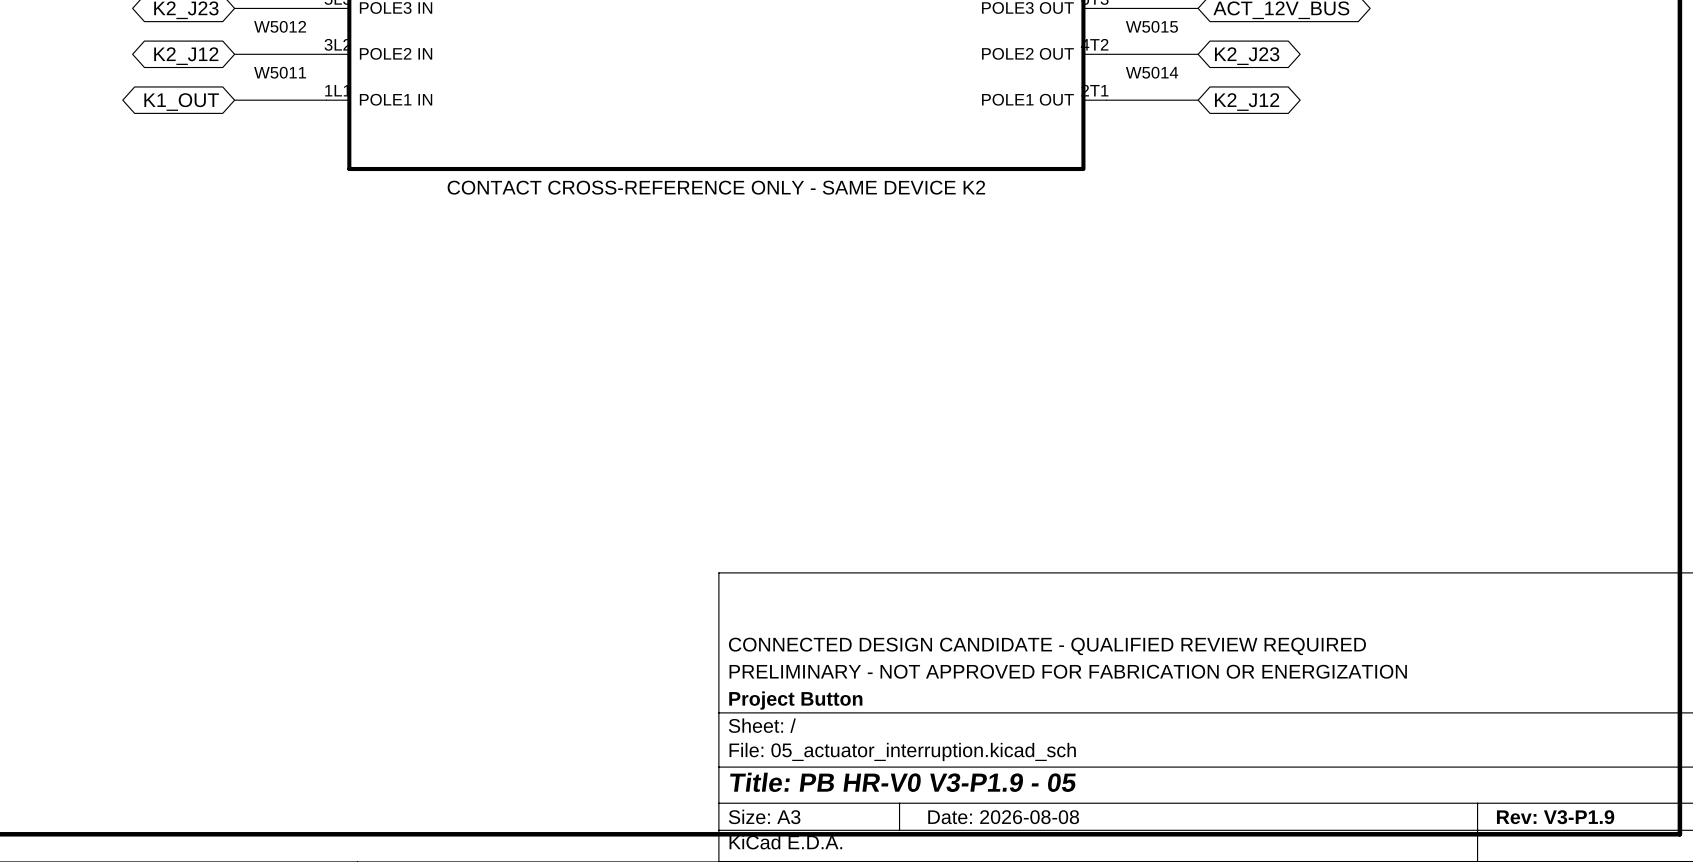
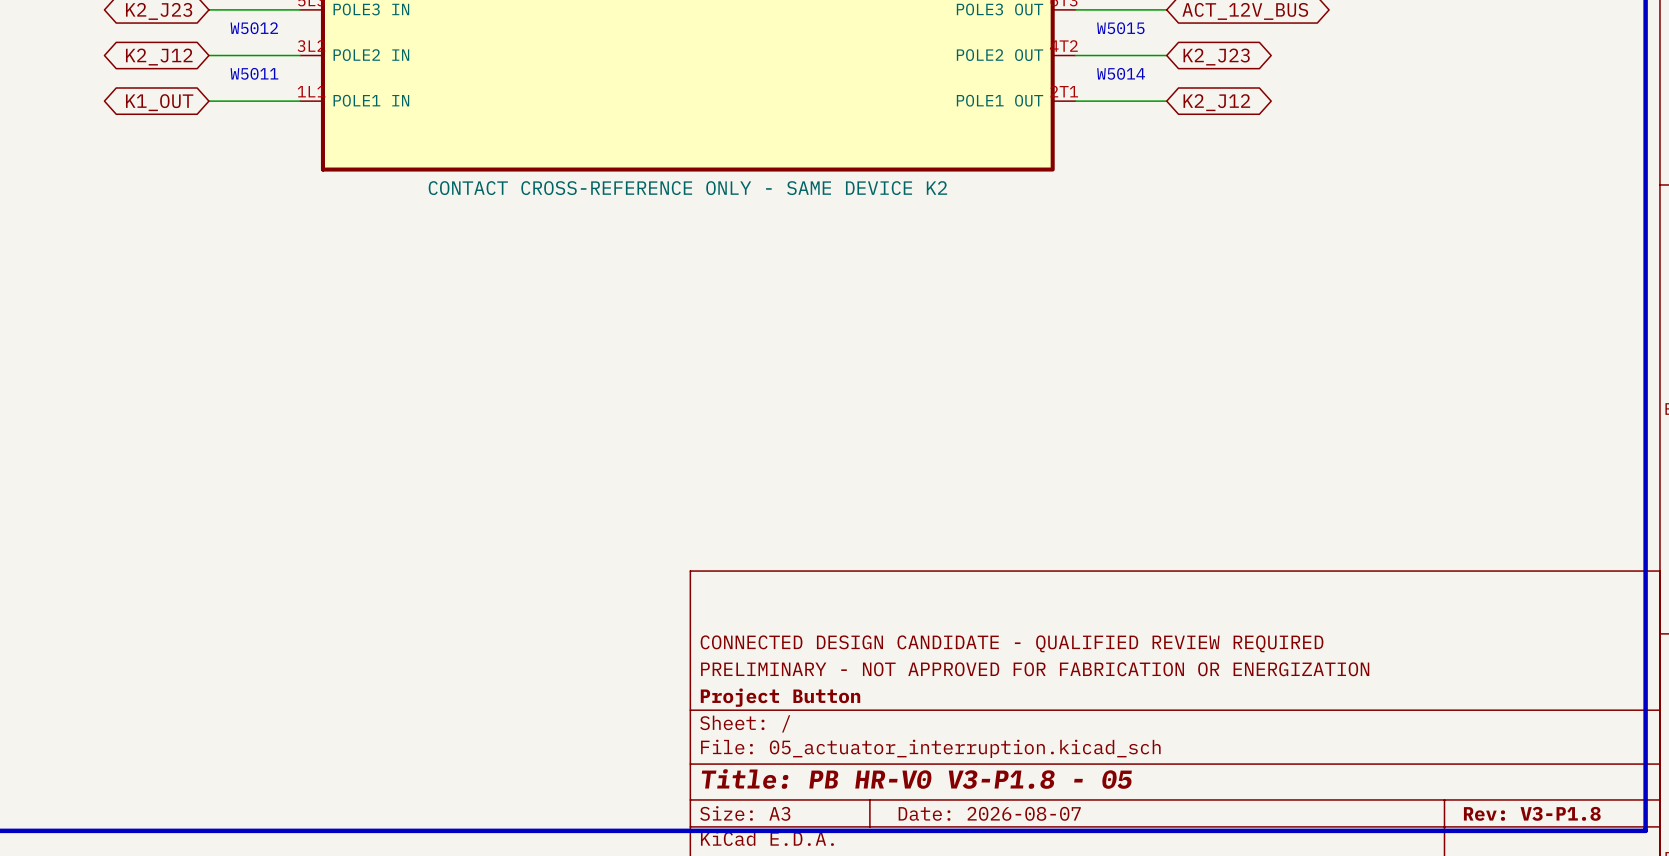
title block: Title: PB HR-V0 V3-P1.9 - 05 (902, 782) -> Title: PB HR-V0 V3-P1.8 - 05 (916, 779)
title block: Date: 2026-08-08 (1003, 817) -> Date: 2026-08-07 (989, 813)
title block: Rev: V3-P1.9 (1555, 817) -> Rev: V3-P1.8 (1532, 813)

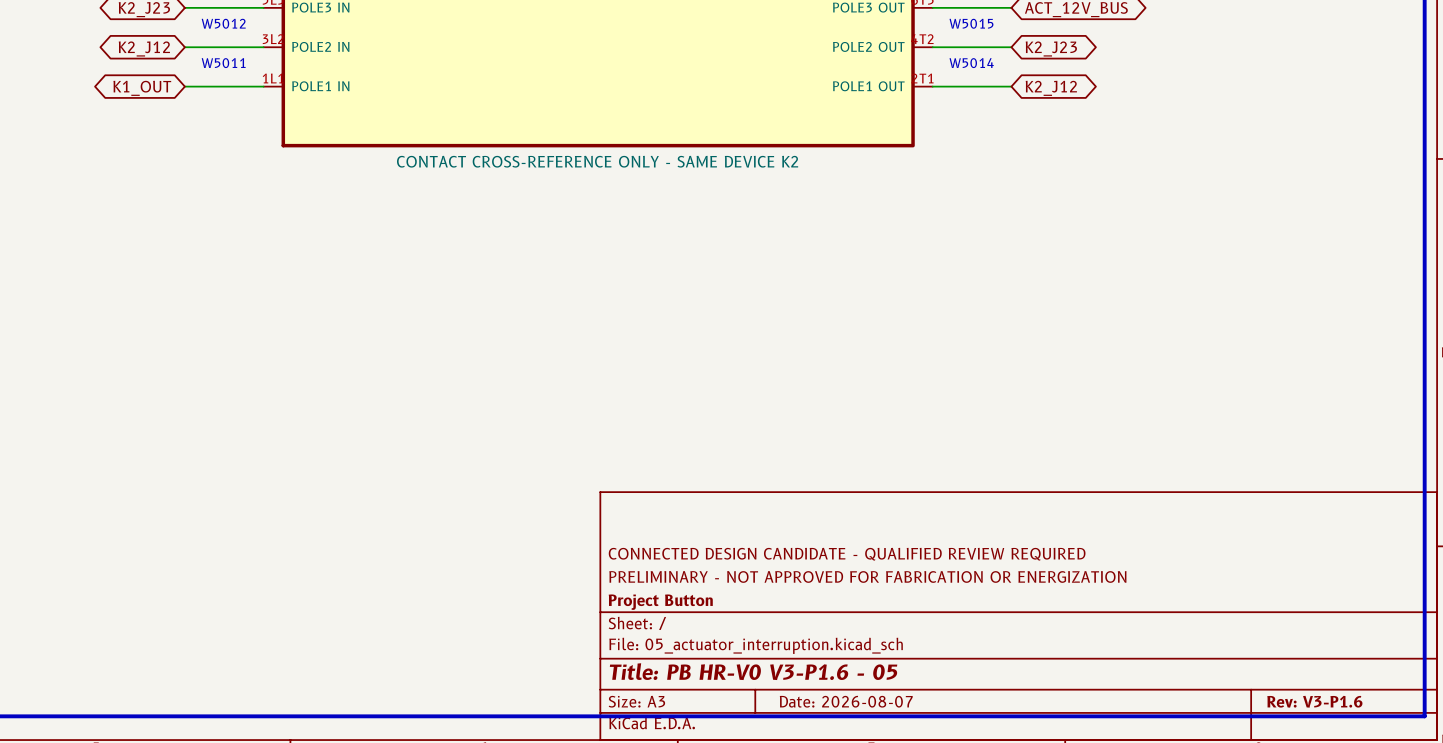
title block: Title: PB HR-V0 V3-P1.8 - 05 (916, 779) -> Title: PB HR-V0 V3-P1.6 - 05 (753, 671)
title block: Rev: V3-P1.8 (1532, 813) -> Rev: V3-P1.6 (1314, 701)

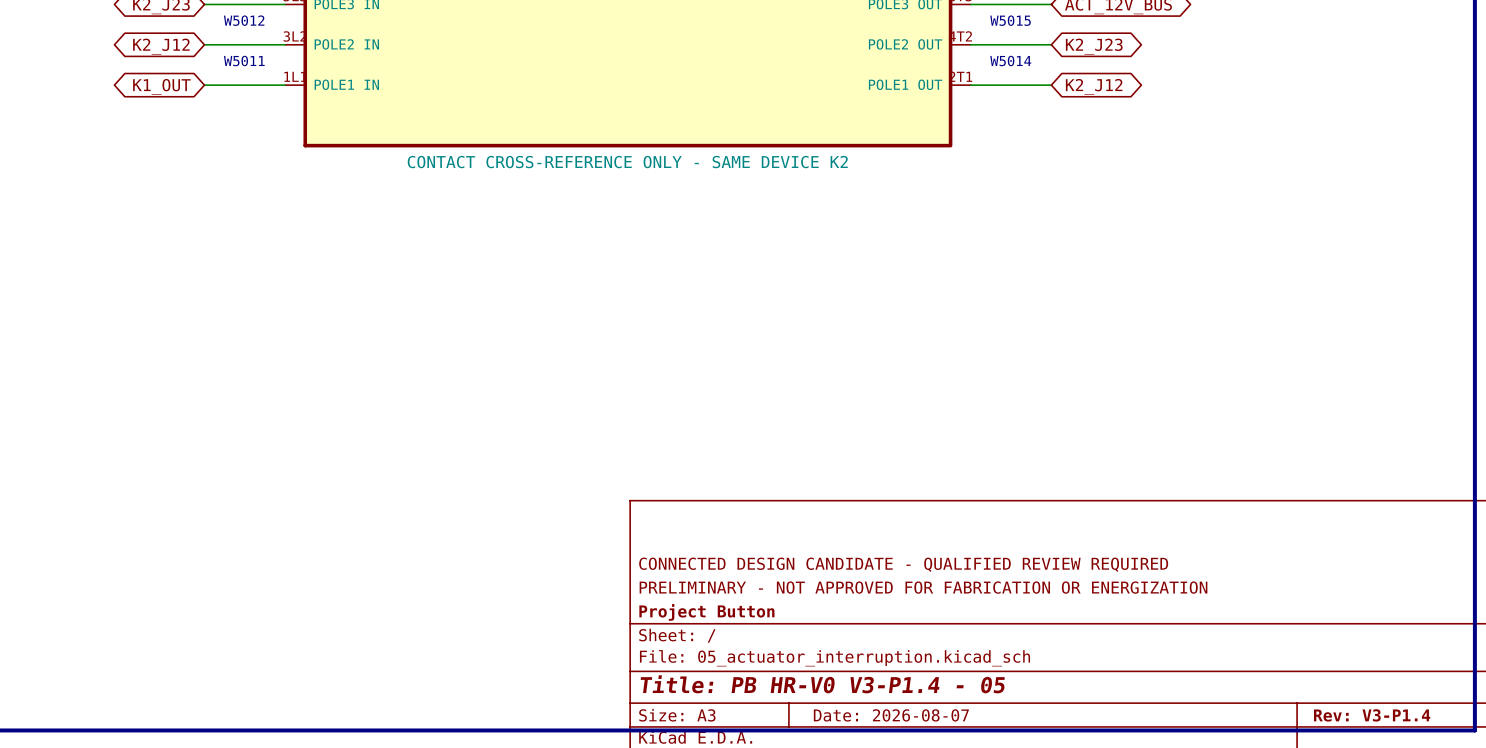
title block: Title: PB HR-V0 V3-P1.6 - 05 (753, 671) -> Title: PB HR-V0 V3-P1.4 - 05 (822, 684)
title block: Rev: V3-P1.6 (1314, 701) -> Rev: V3-P1.4 (1372, 715)

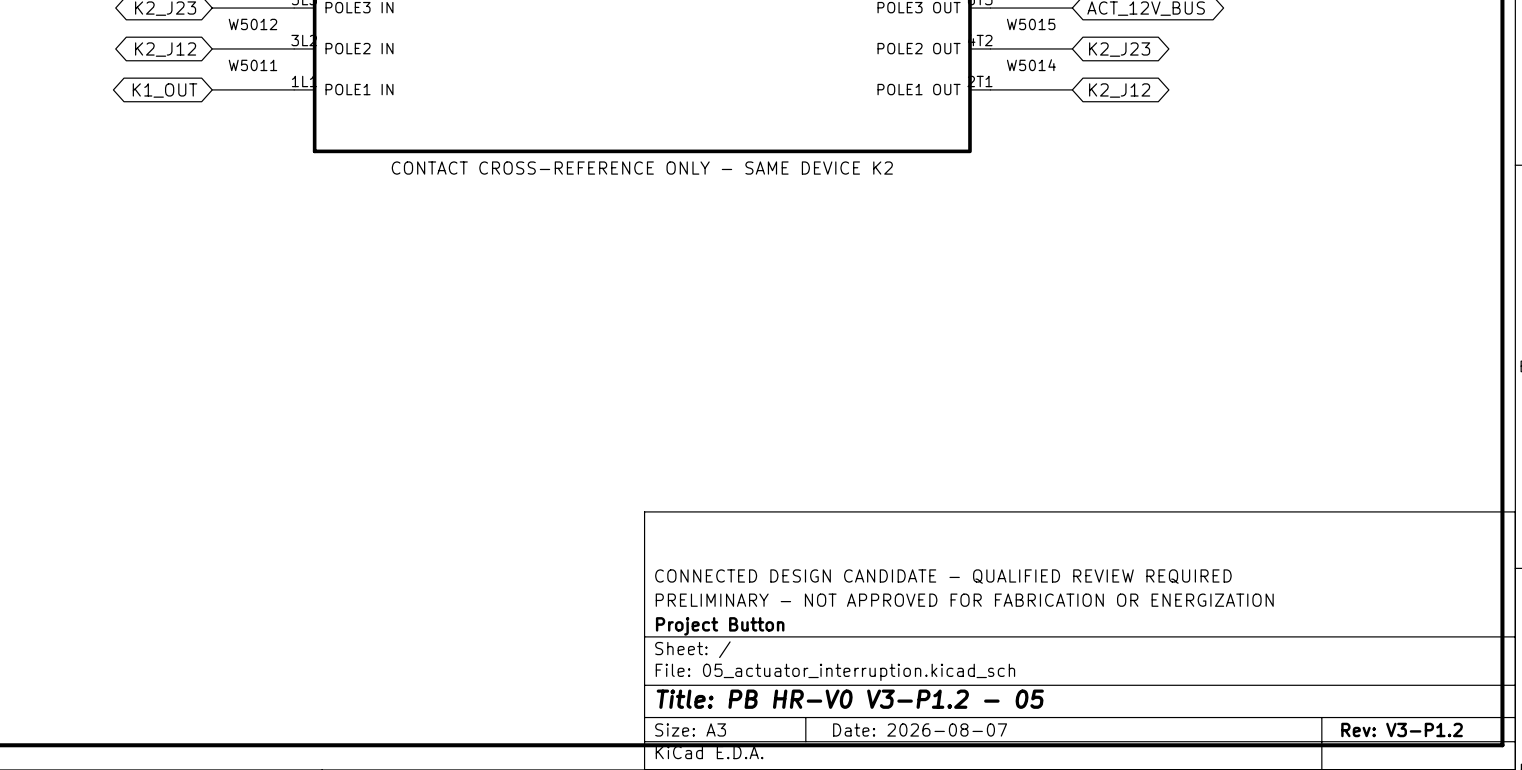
title block: Title: PB HR-V0 V3-P1.4 - 05 (822, 684) -> Title: PB HR-V0 V3-P1.2 - 05 (850, 699)
title block: Rev: V3-P1.4 (1372, 715) -> Rev: V3-P1.2 (1402, 729)

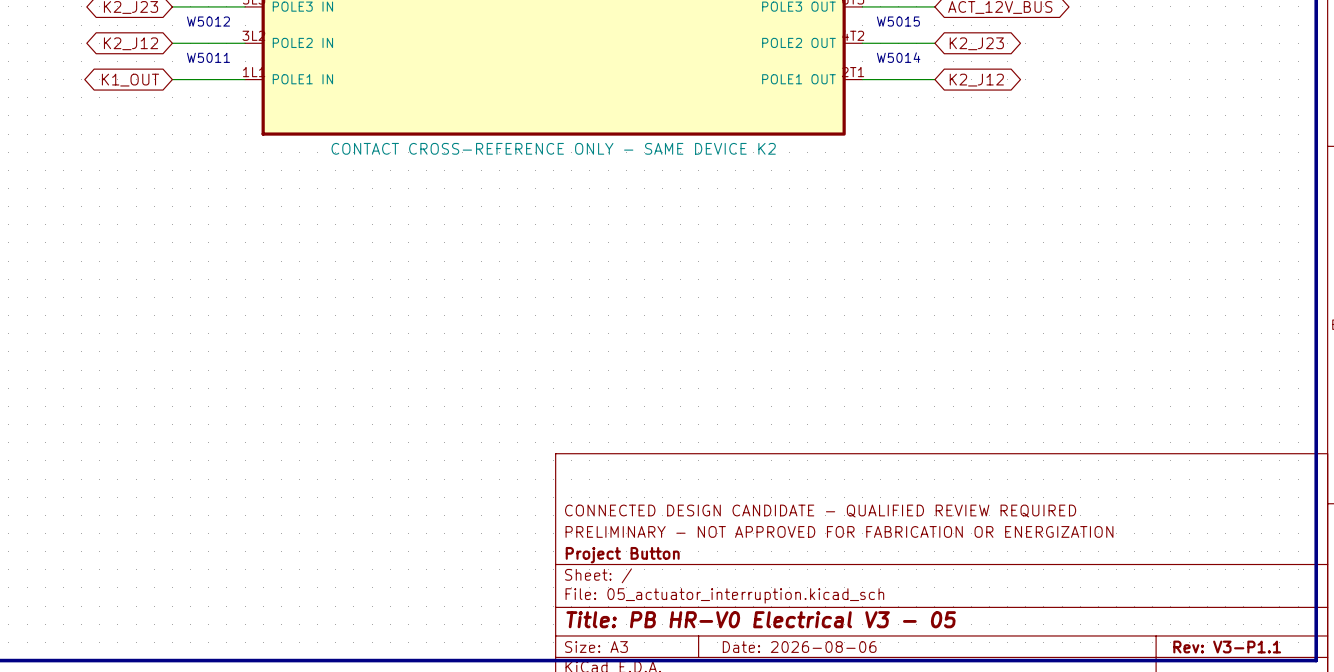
title block: Title: PB HR-V0 V3-P1.2 - 05 (850, 699) -> Title: PB HR-V0 Electrical V3 - 05 (761, 619)
title block: Date: 2026-08-07 (920, 729) -> Date: 2026-08-06 (799, 647)
title block: Rev: V3-P1.2 (1402, 729) -> Rev: V3-P1.1 (1227, 647)

